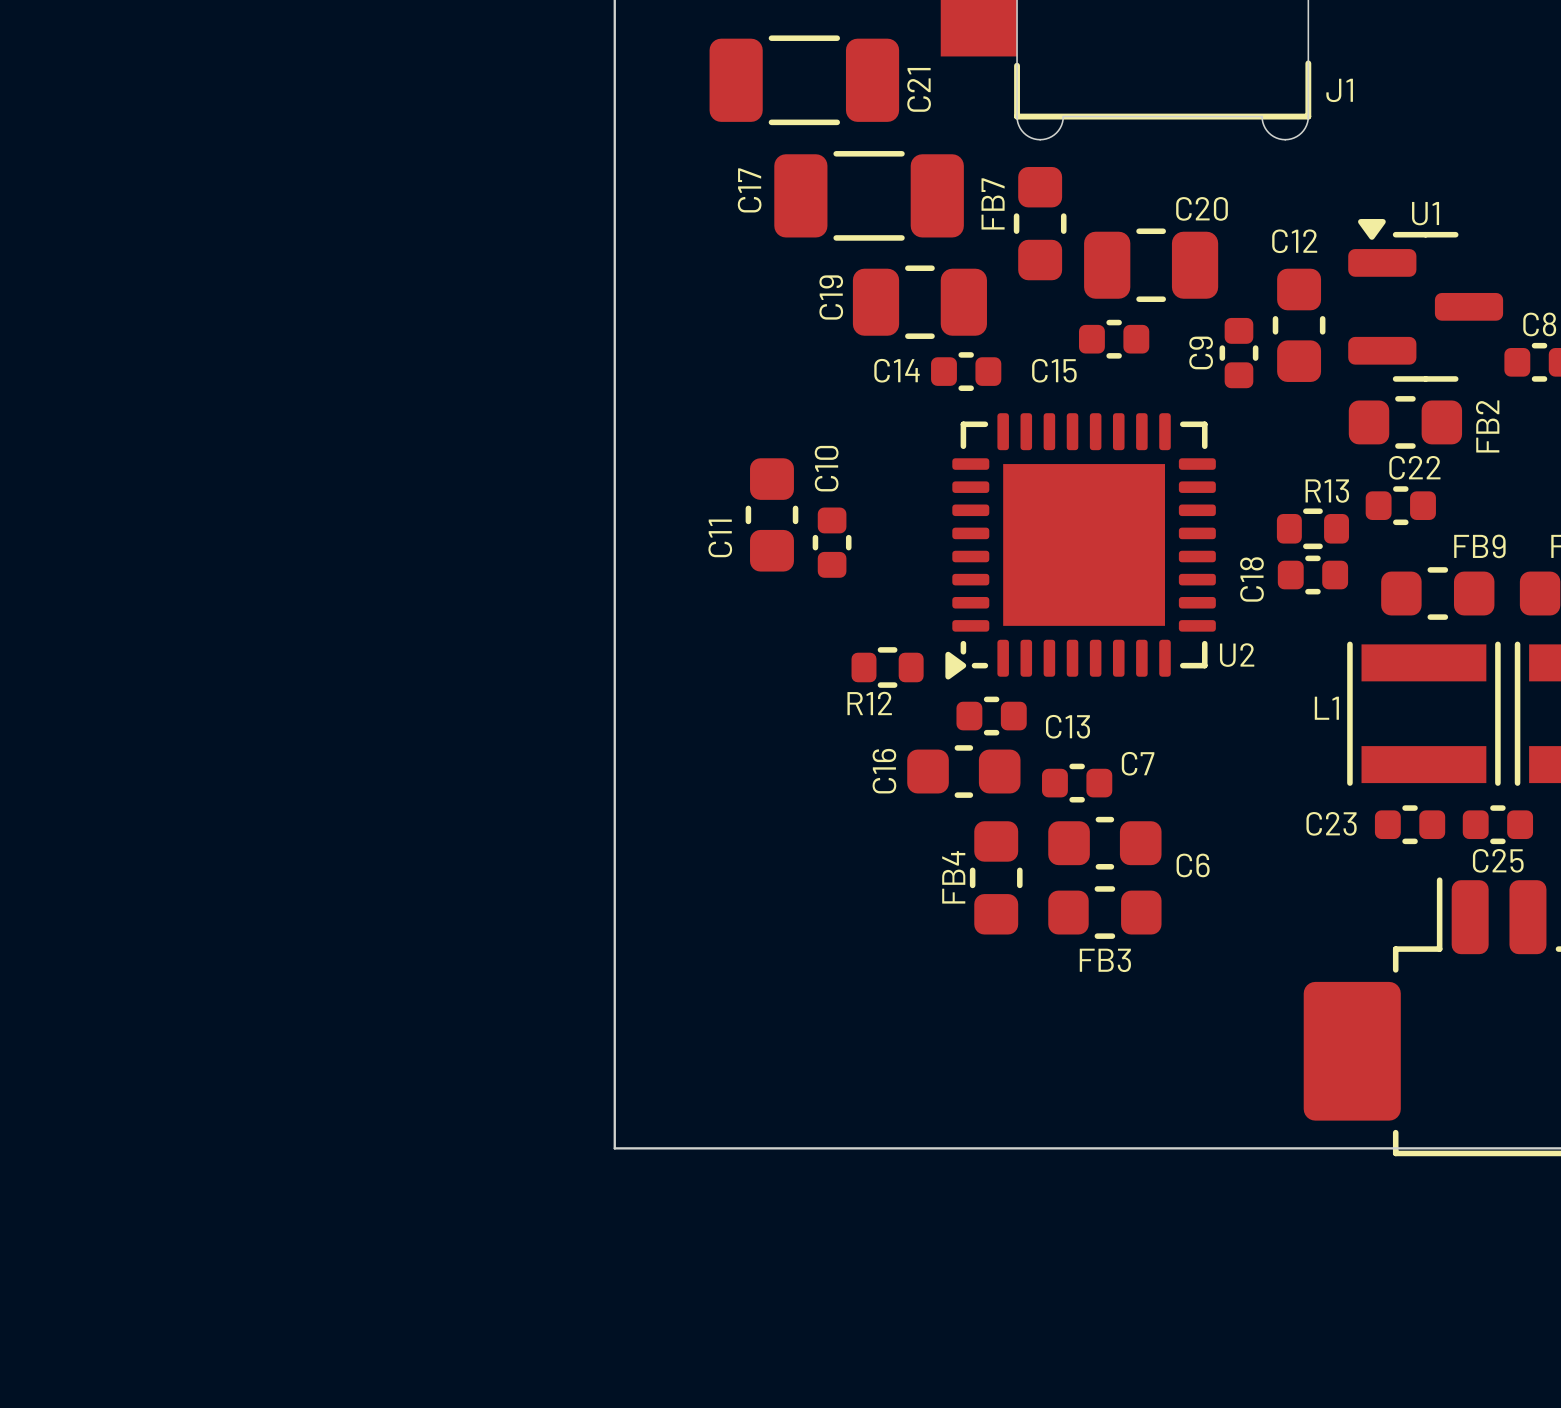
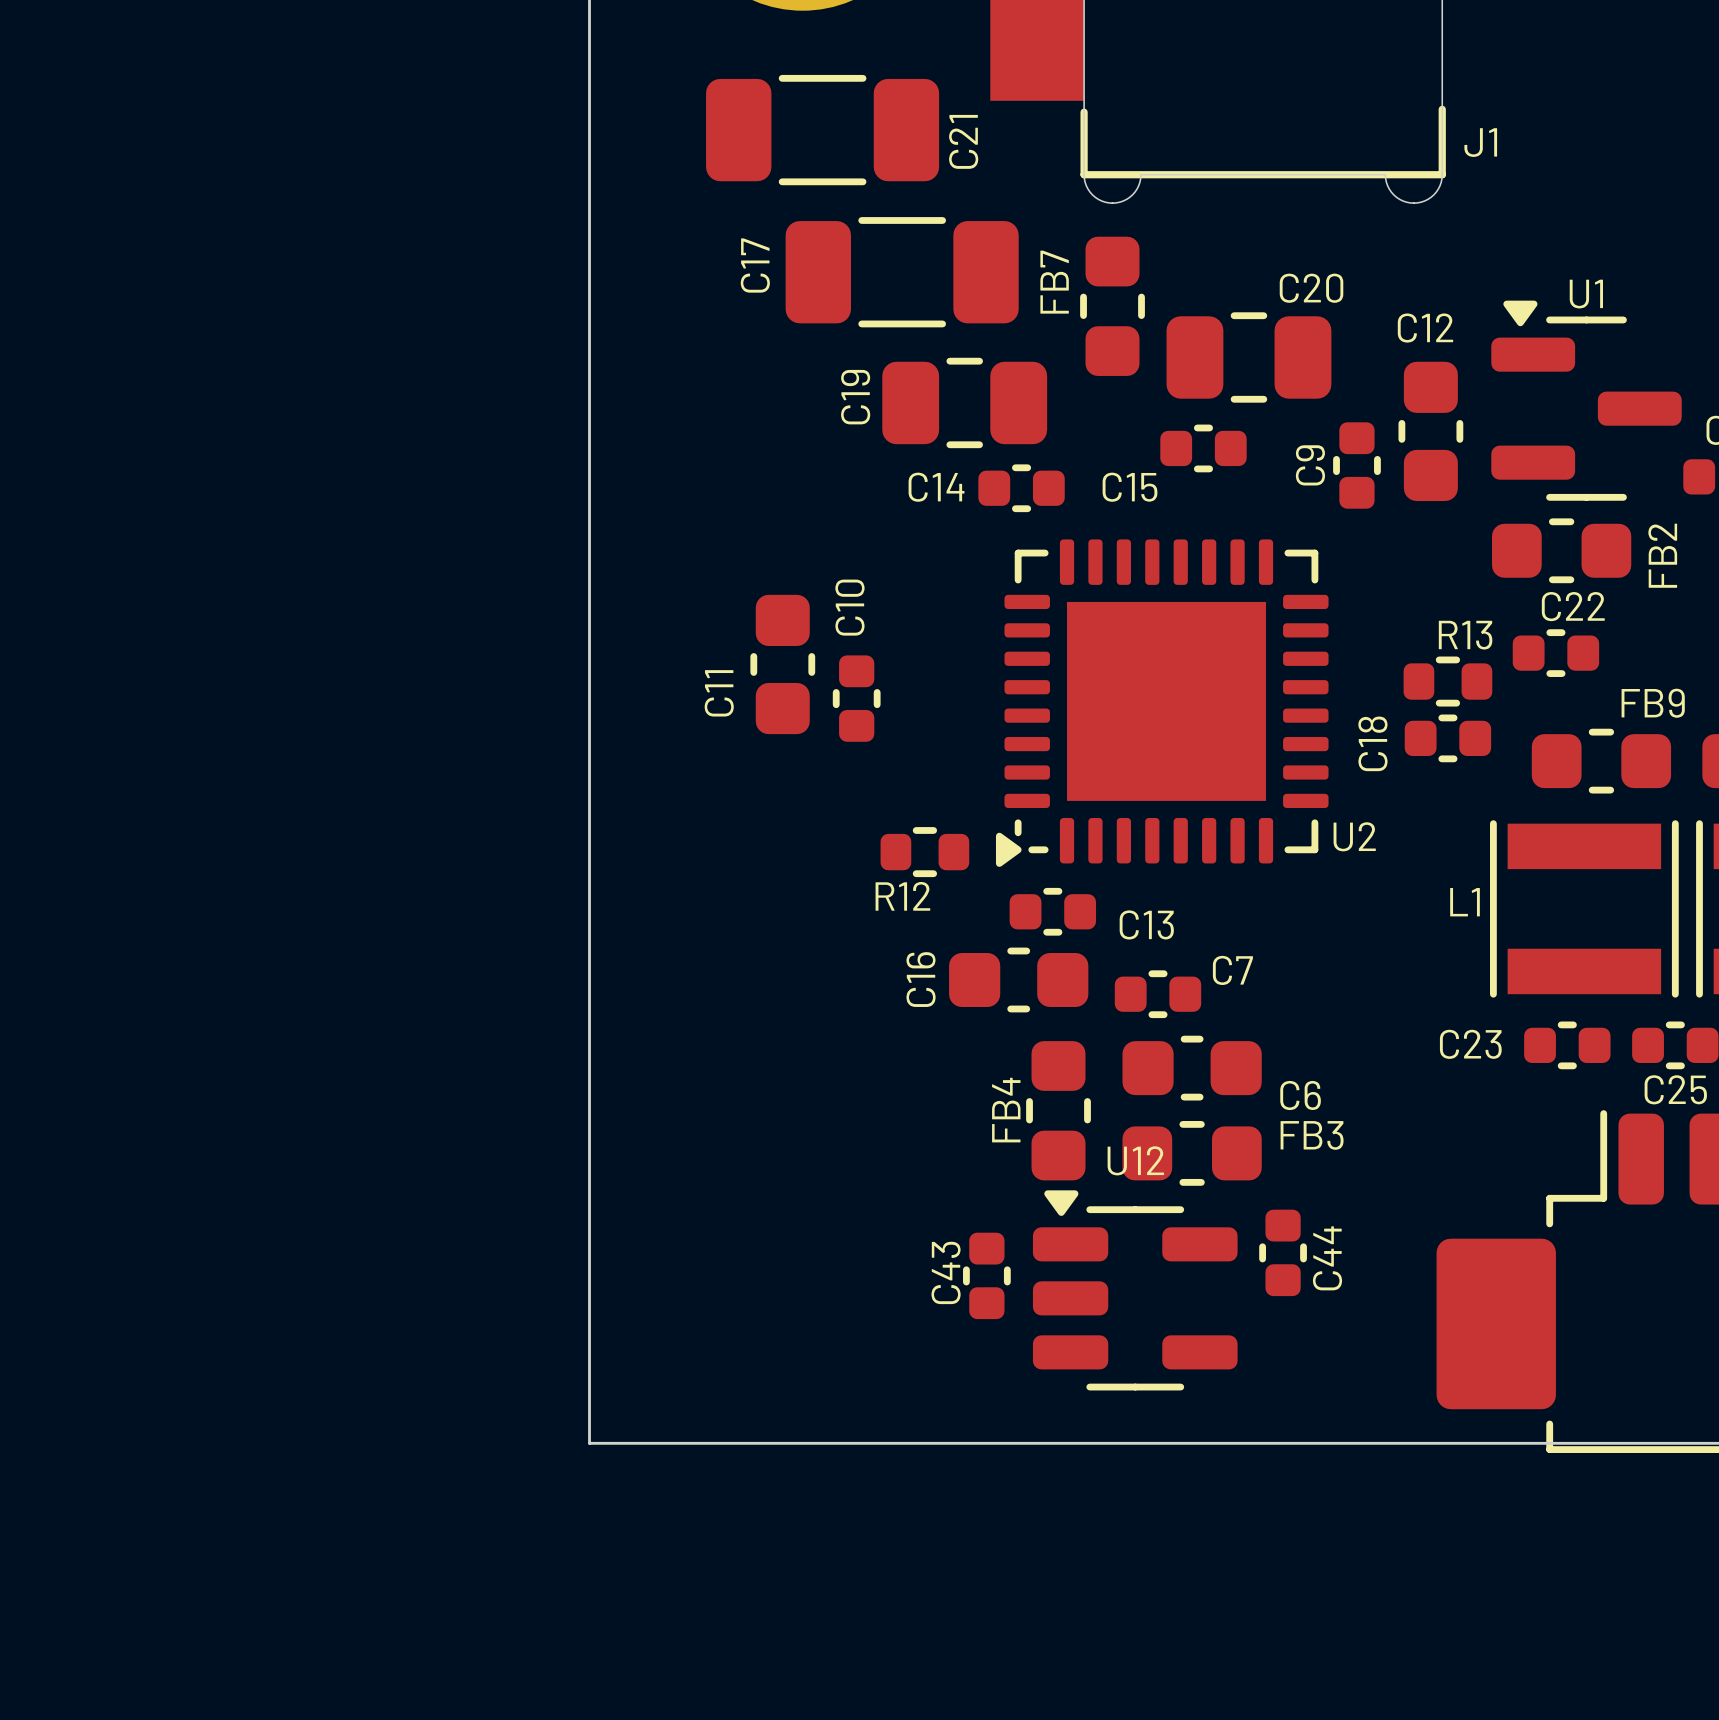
FB3 name position: FB3 (1105, 960) -> FB3 (1312, 1135)
C44: none -> (1283, 1252)
C43: none -> (986, 1275)
U12: none -> (1135, 1290)

